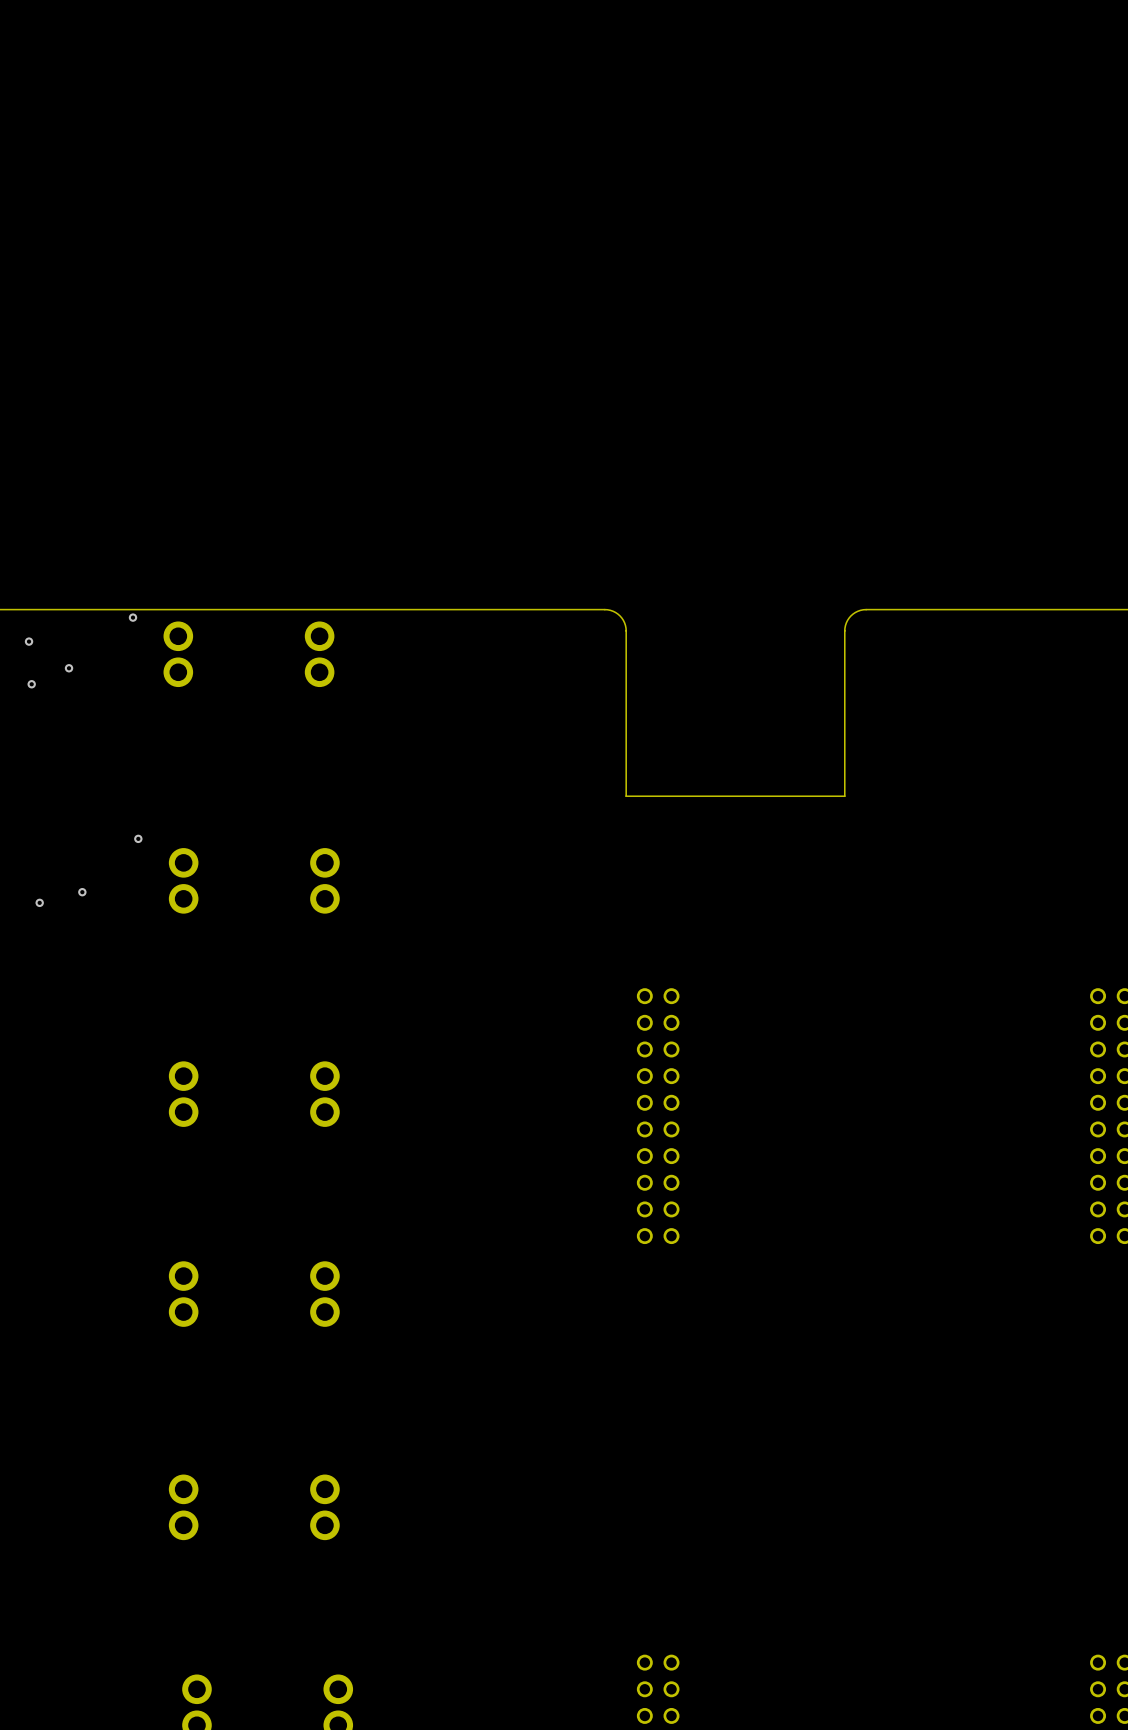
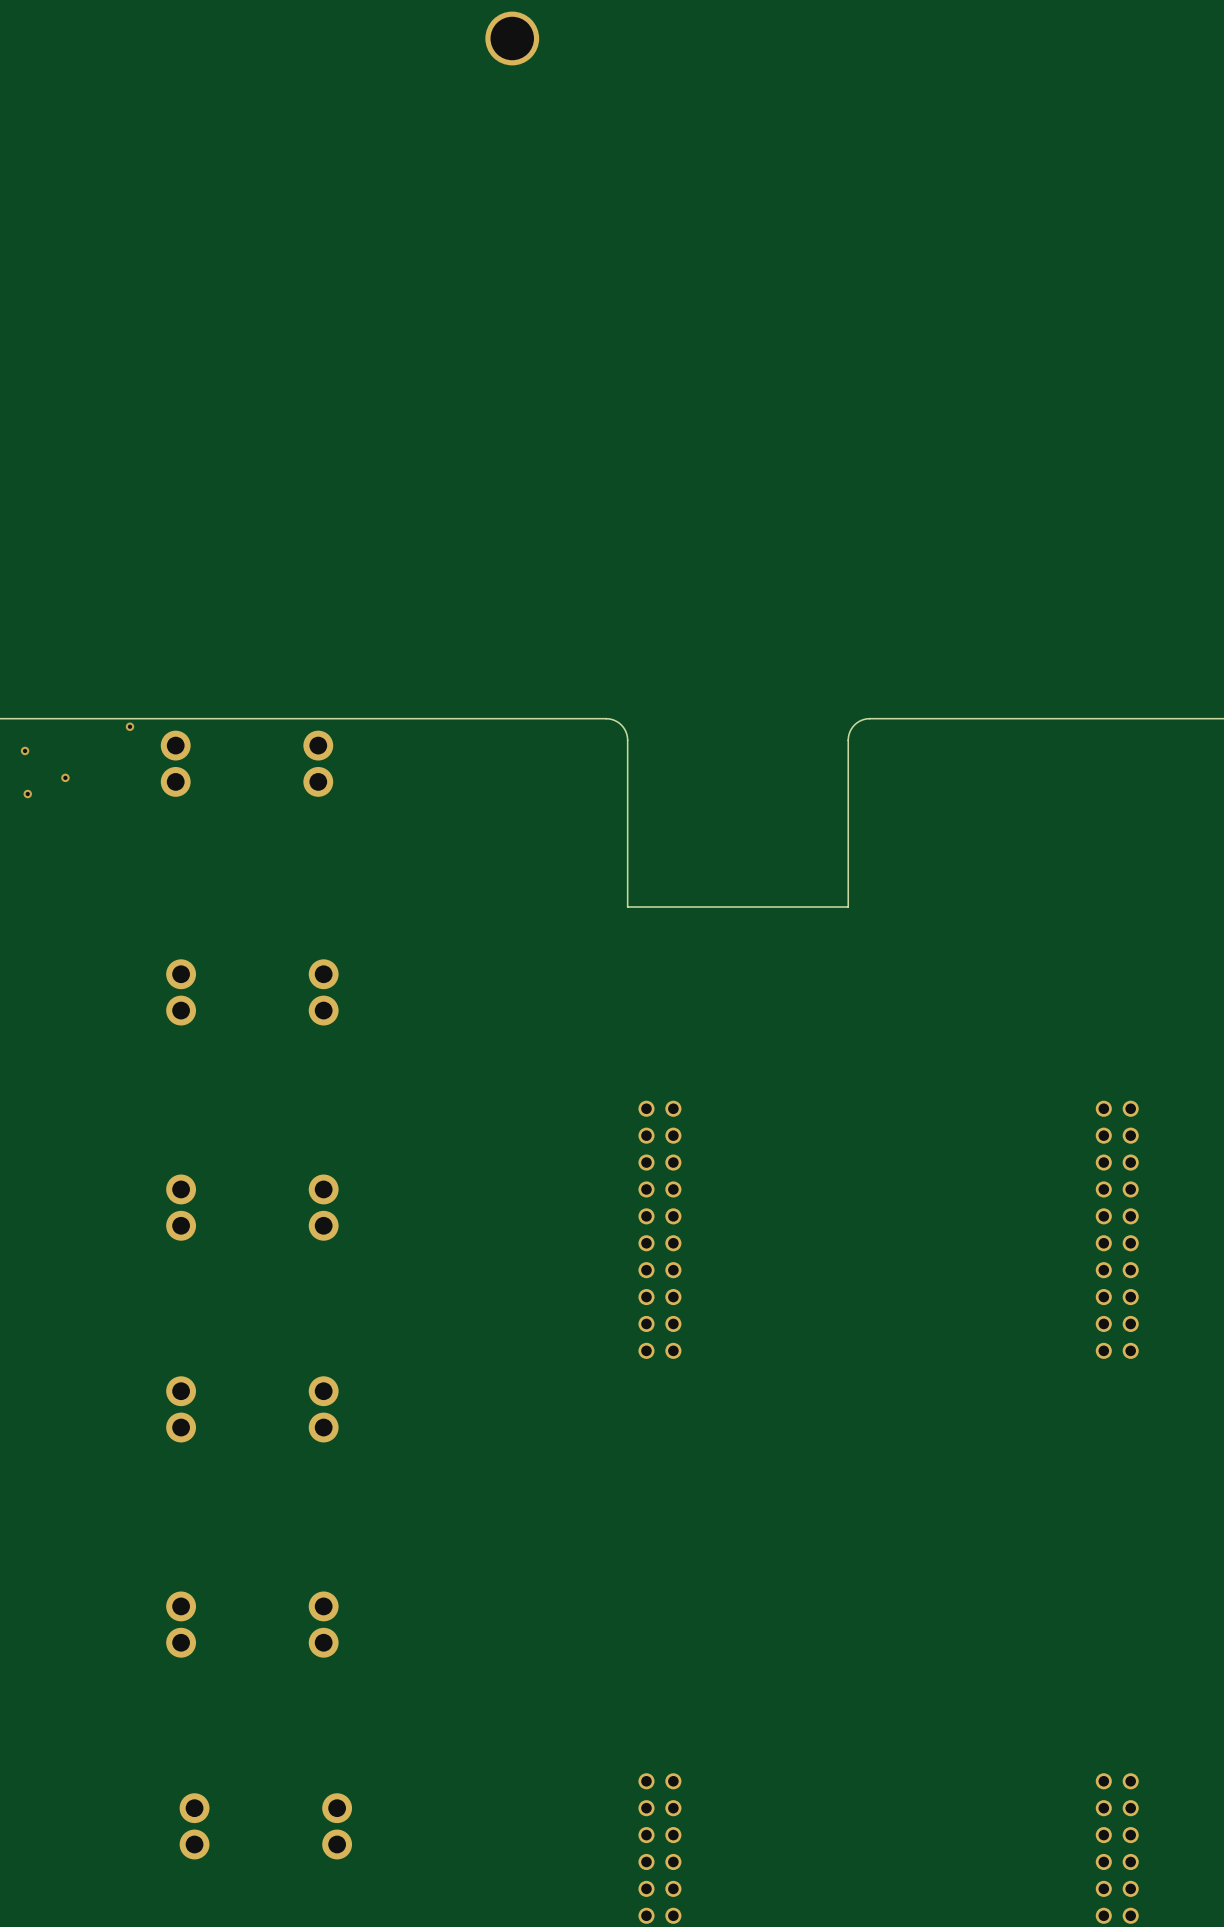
via: (138, 838) -> none
via: (82, 892) -> none
via: (39, 902) -> none

